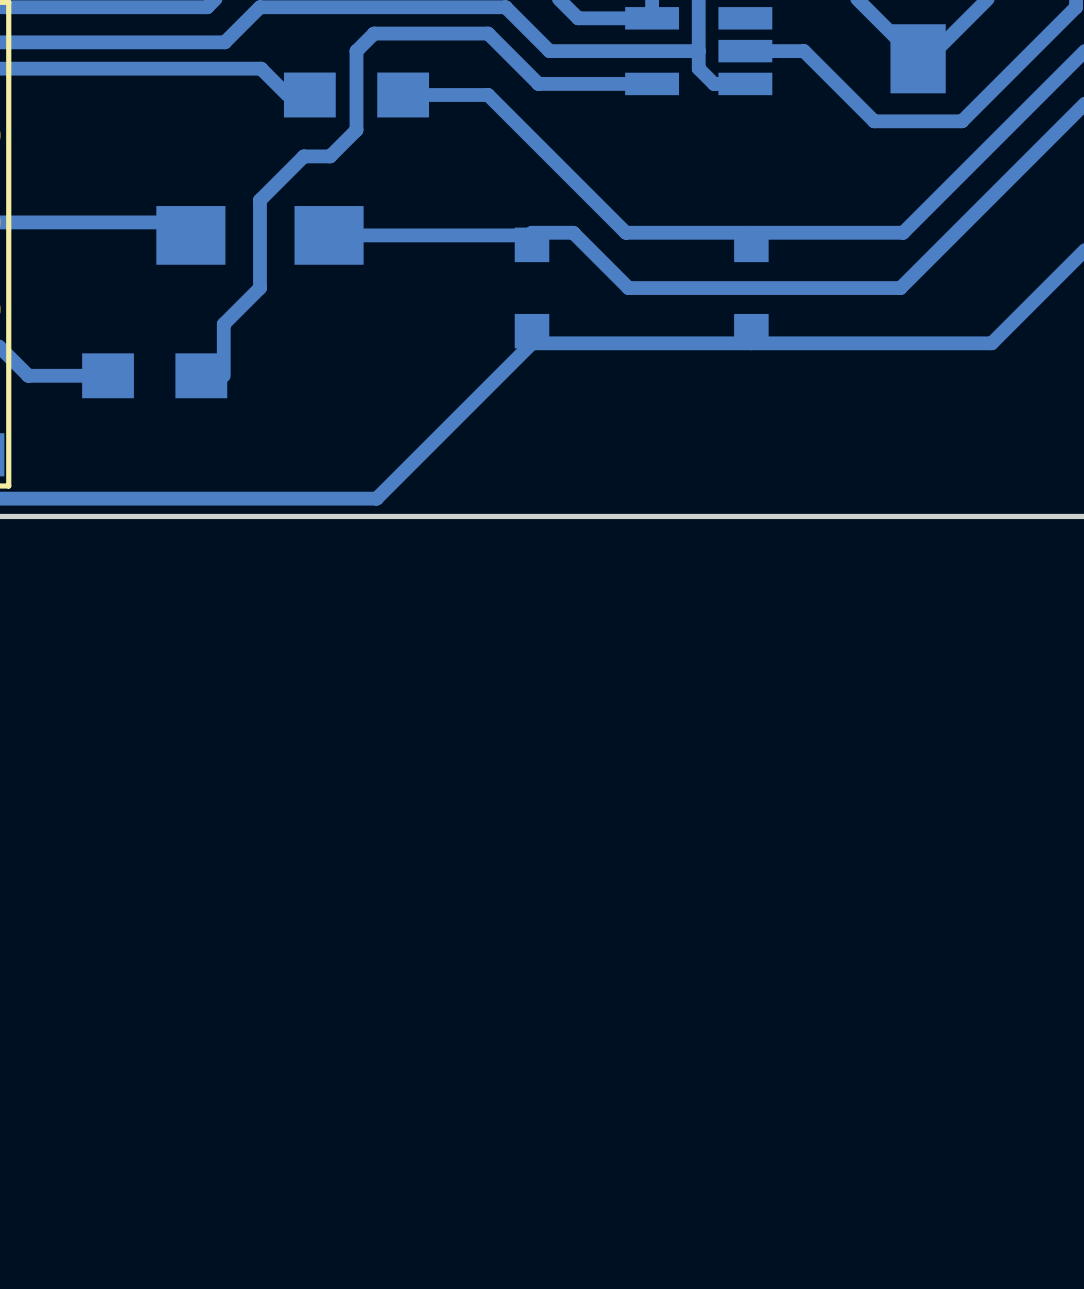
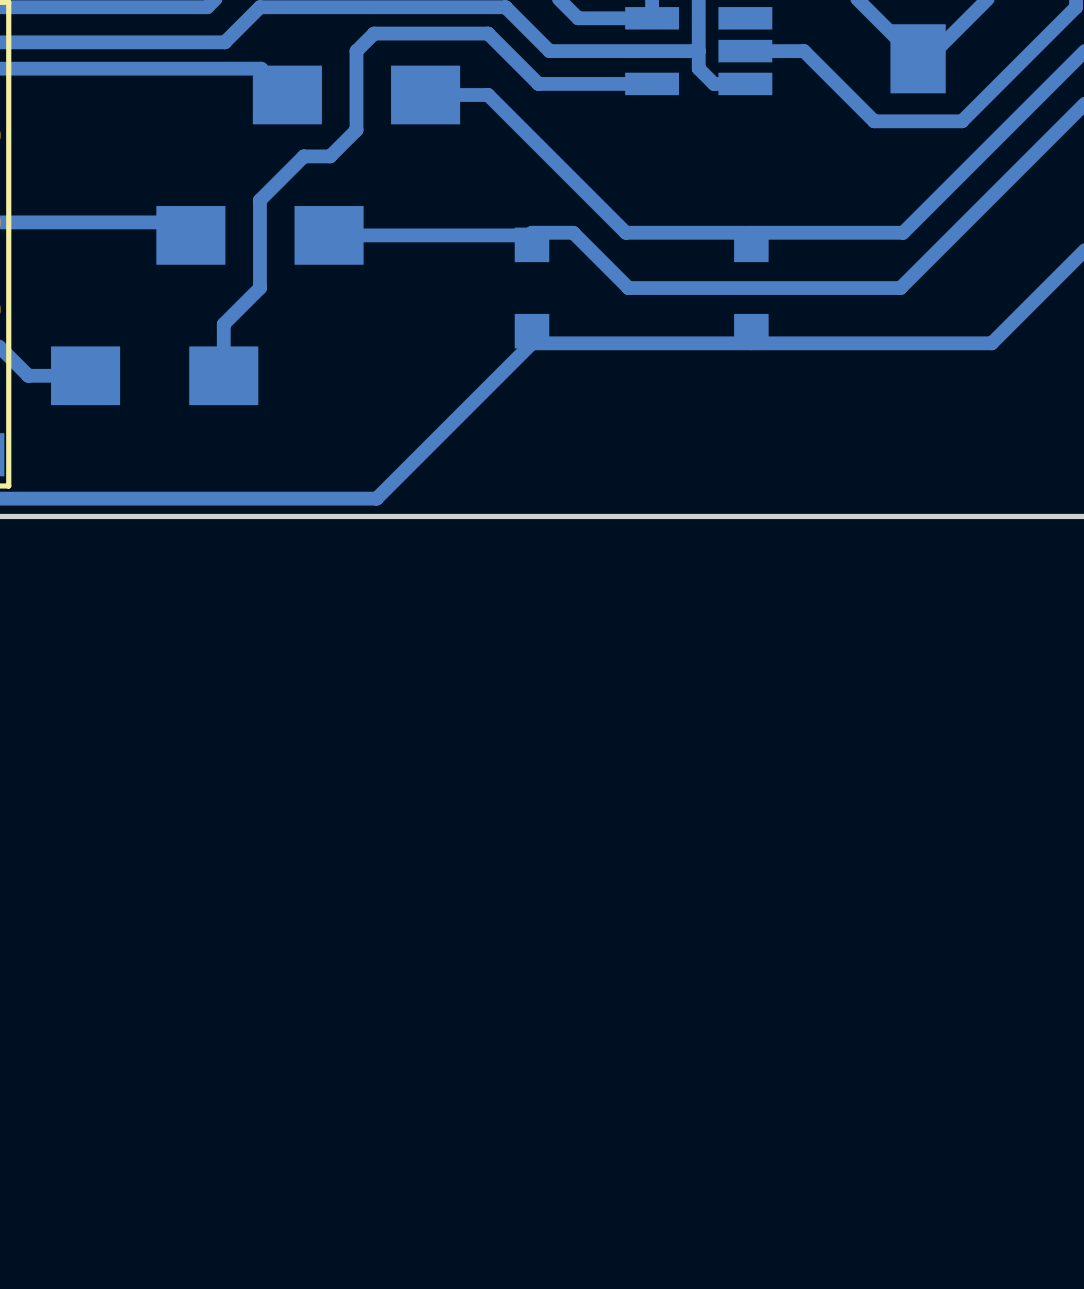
part footprint: [283, 72, 430, 118] -> [252, 65, 461, 125]
part footprint: [82, 353, 228, 399] -> [51, 346, 259, 406]

